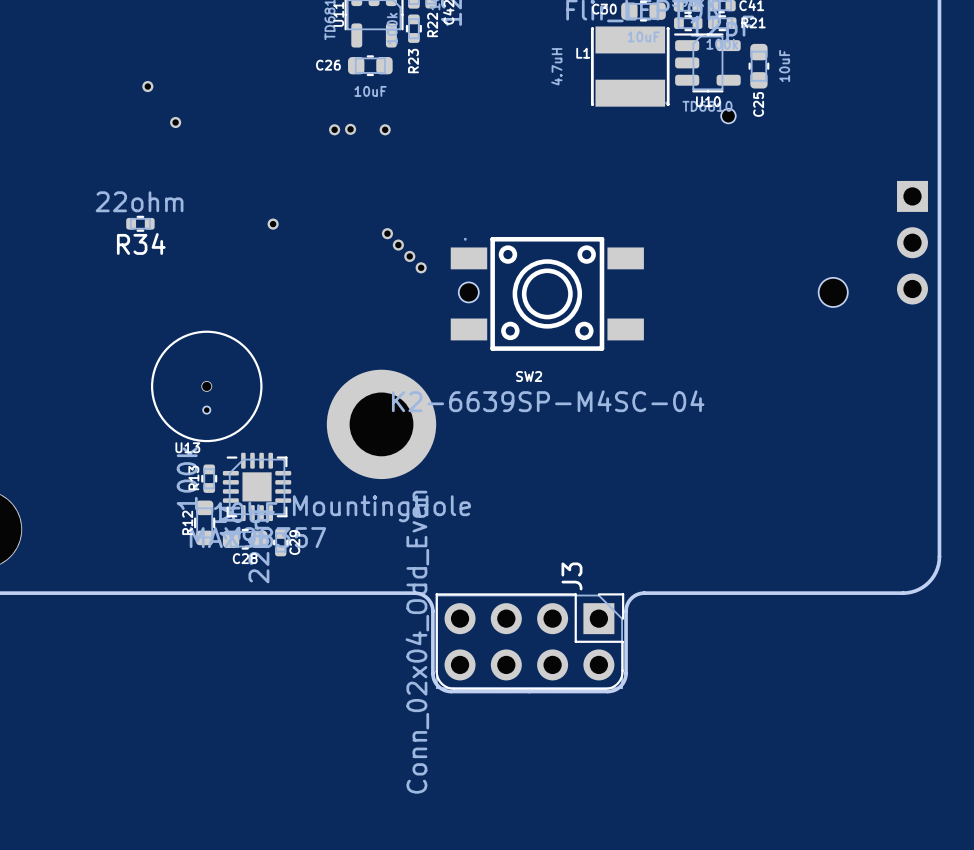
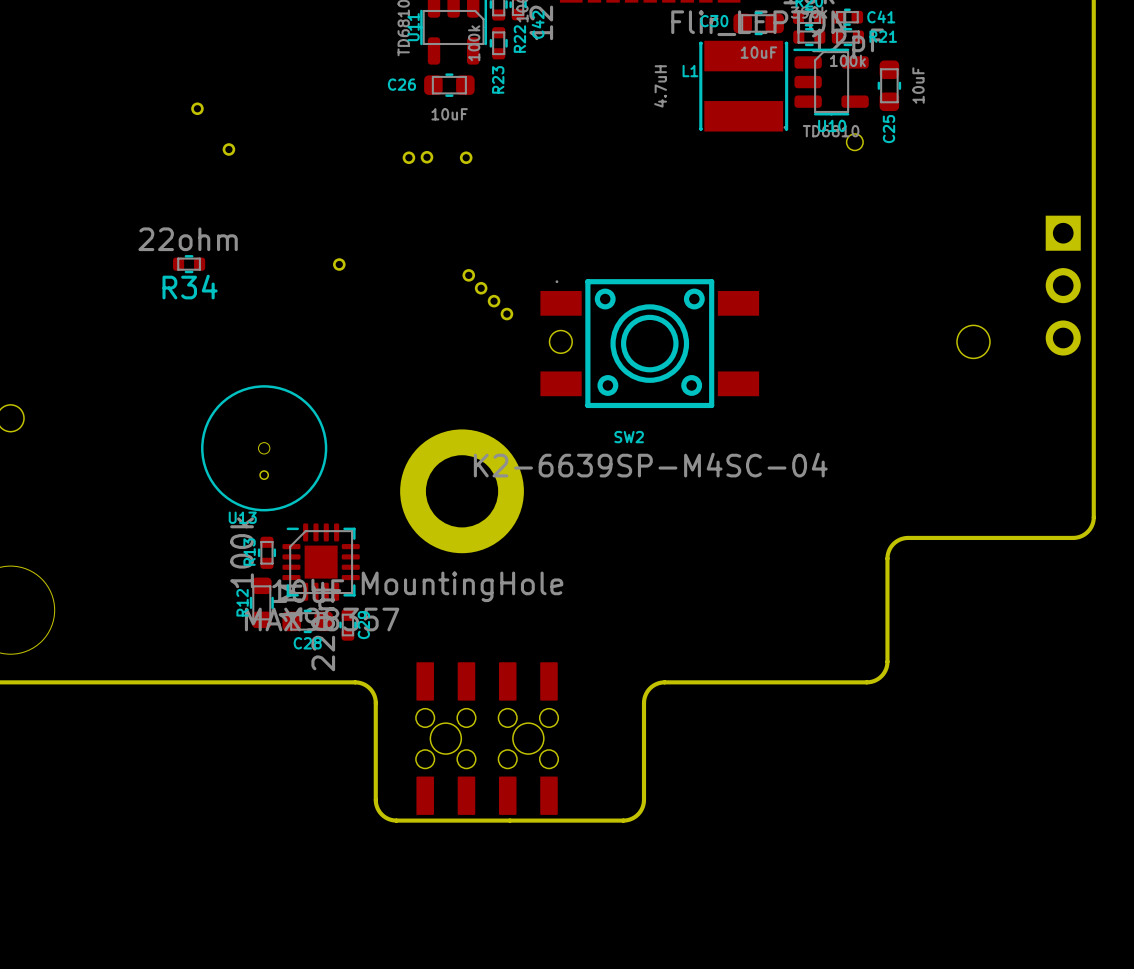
board edge: (939, 447) (939, 560) (933, 576) (925, 585) (915, 591) (903, 593) (739, 593) -> (1093, 517) (1089, 530) (1082, 535) (1075, 537) (908, 537) (895, 542) (890, 547) (887, 556) (886, 666) (879, 677) (866, 682)
board edge: (287, 593) (414, 593) (424, 595) (430, 601) (432, 609) (433, 677) (439, 687) (451, 691) (607, 691) (615, 689) (623, 683) (625, 675) (627, 605) (634, 595) (644, 593) -> (355, 682) (366, 685) (374, 696) (376, 804) (383, 816) (396, 820) (630, 819) (639, 812) (643, 802) (644, 702) (645, 696) (650, 688) (657, 683) (664, 682) (759, 682)
J3: Conn_02x04_Odd_Even (529, 641) -> none
part: none -> (487, 738)

